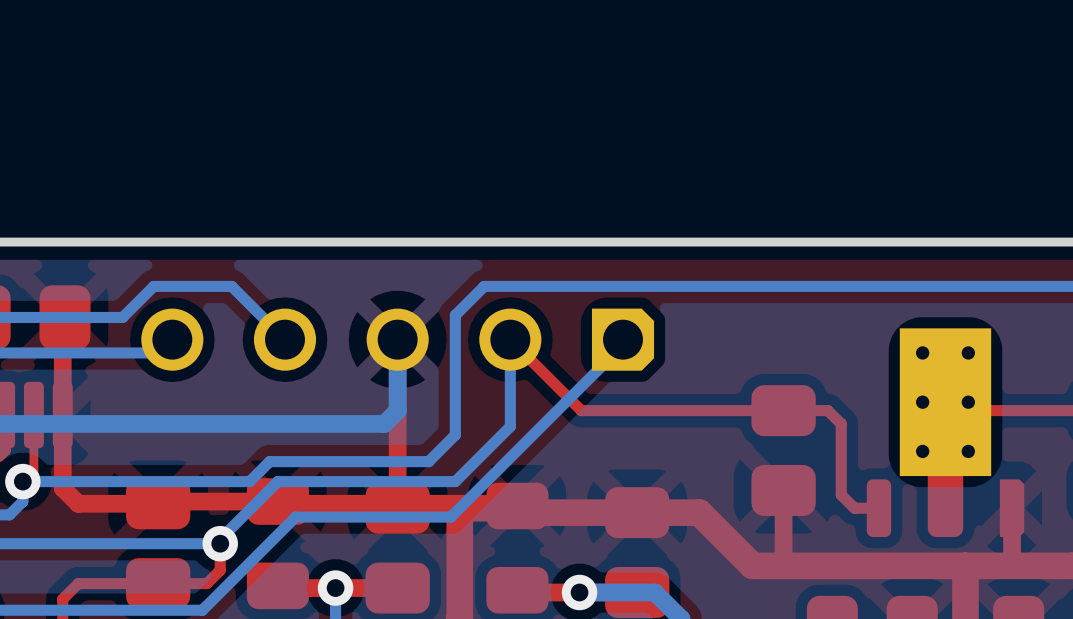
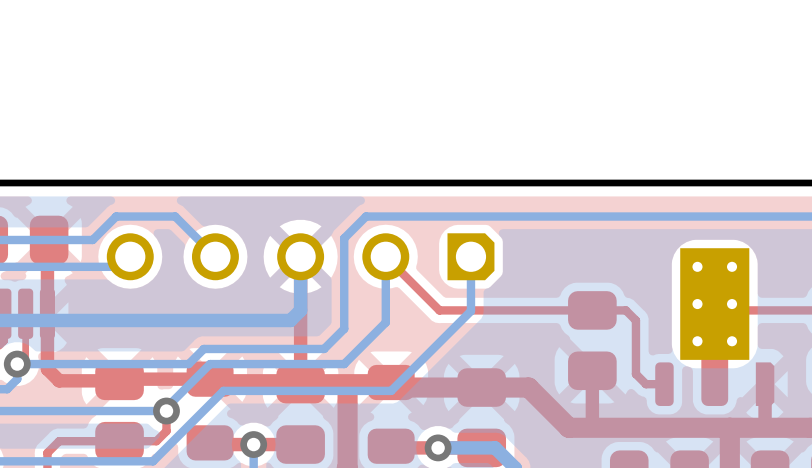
bottom track: (623, 344) (450, 517) -> (470, 260) (470, 311) (391, 390) (340, 390)

